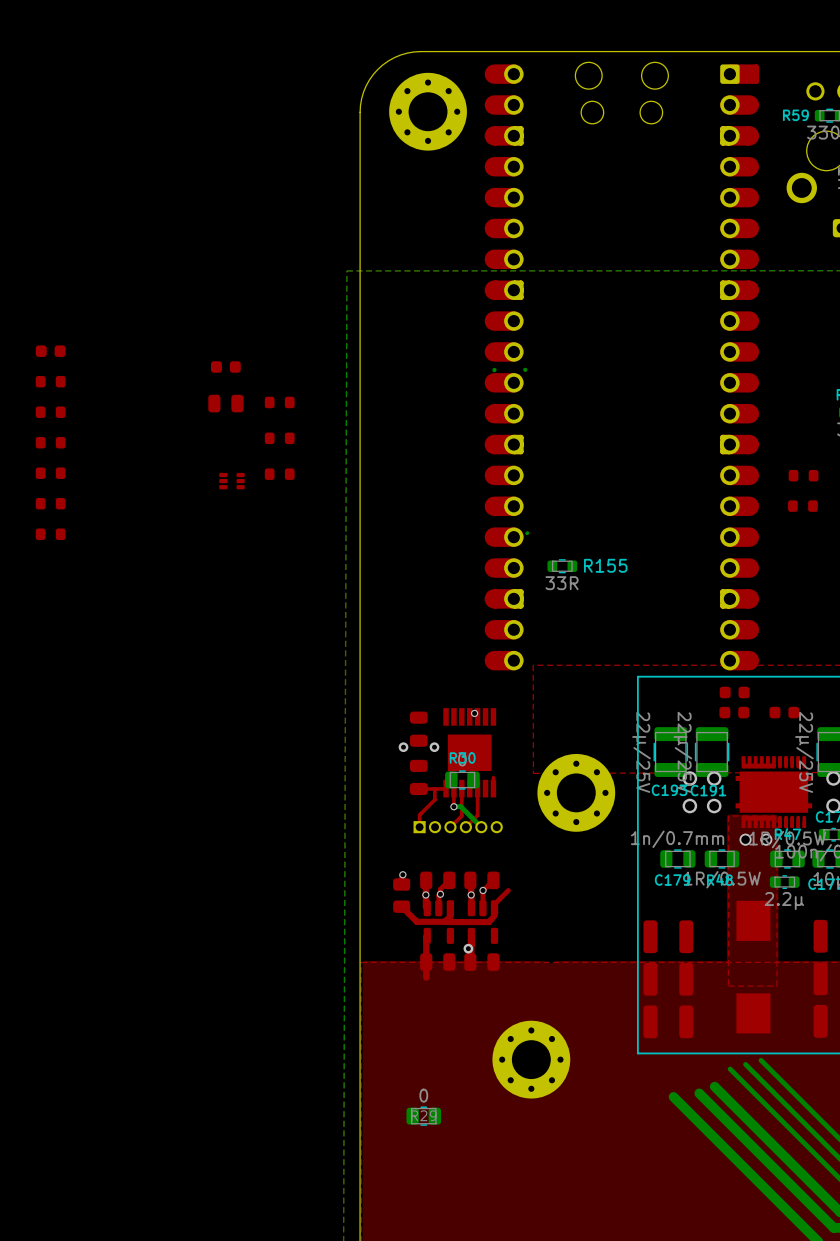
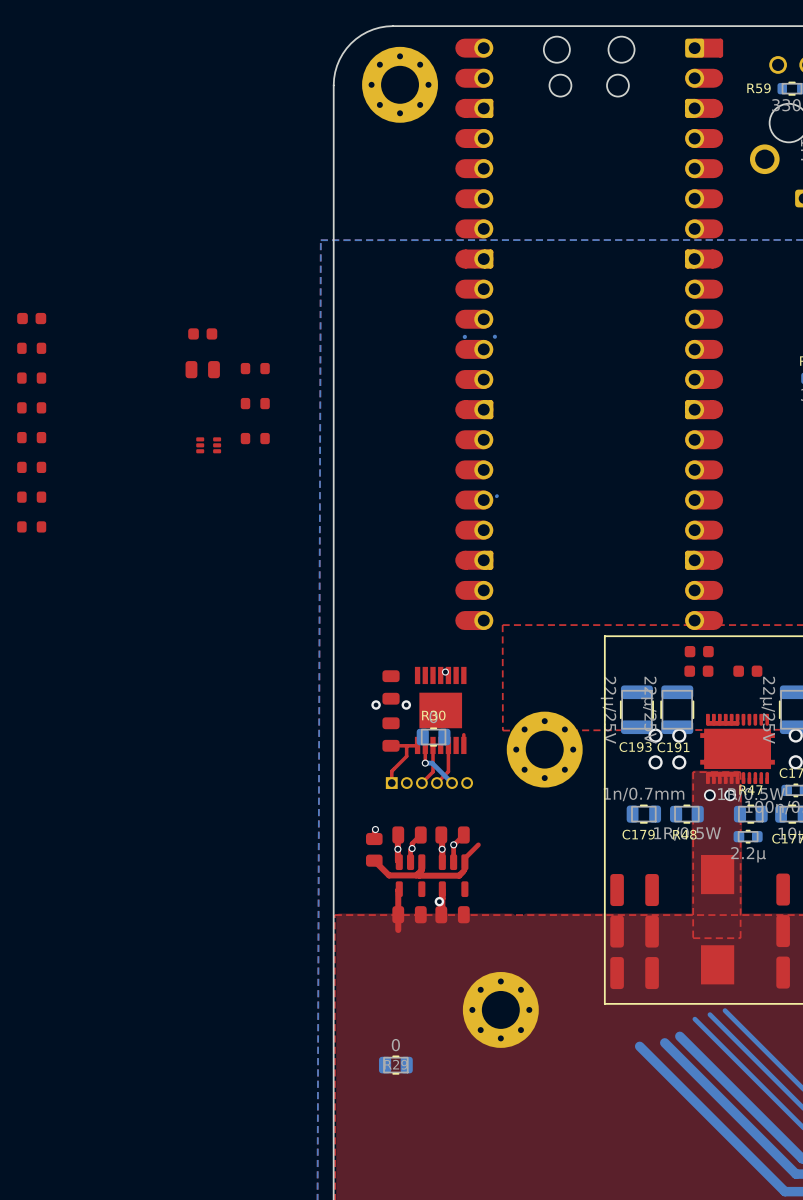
part: (803, 475) -> none
part: (802, 506) -> none
part: none -> (31, 526)
R155: 33R (562, 566) -> none

